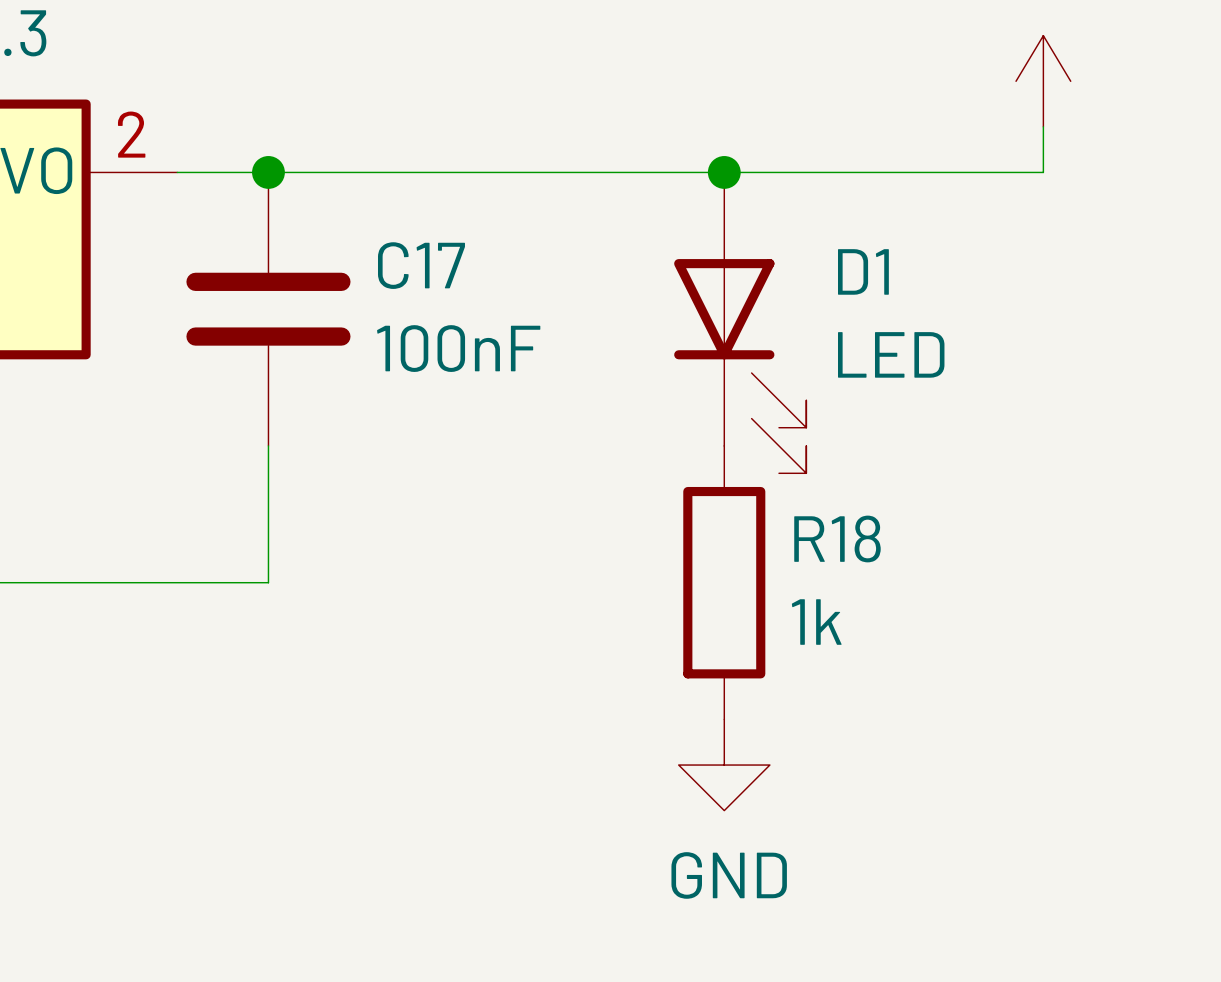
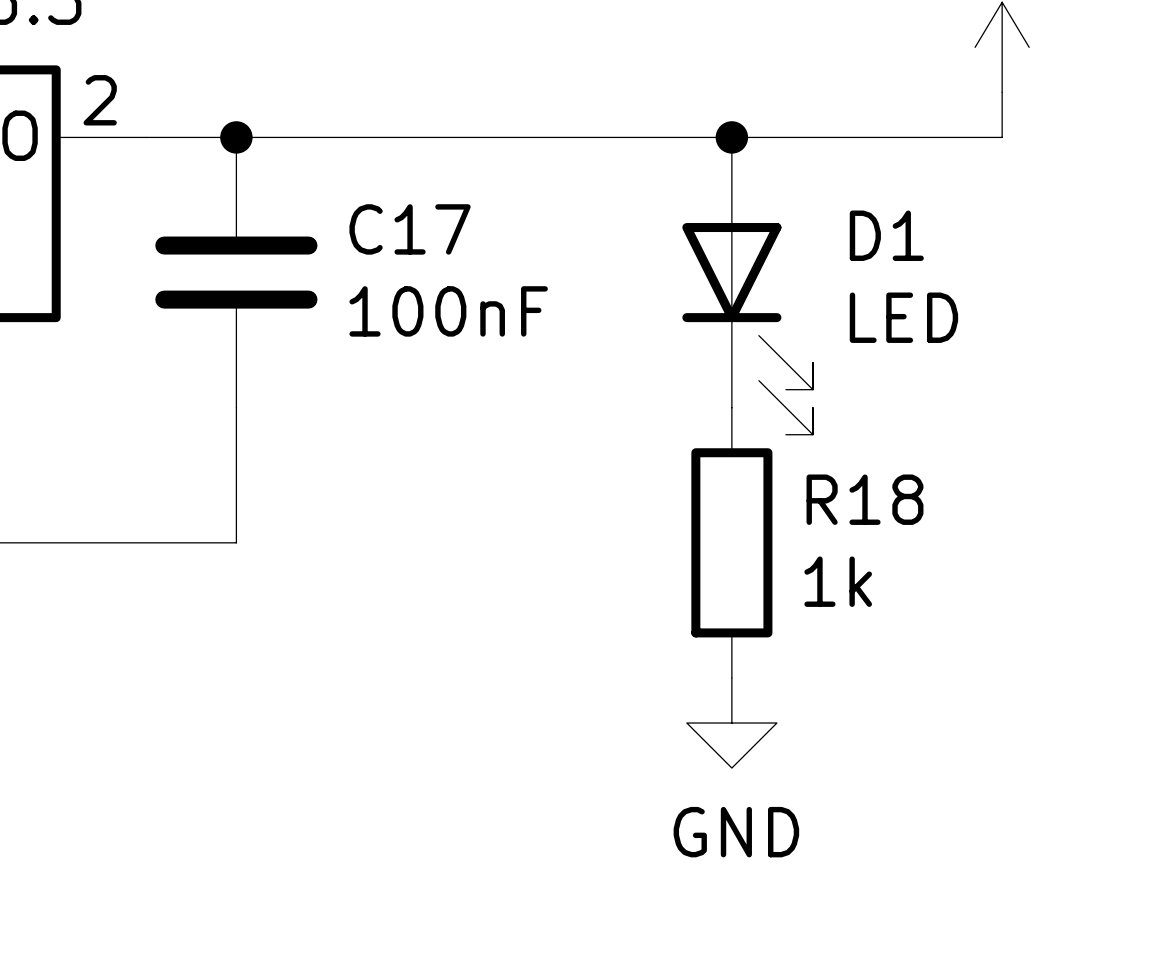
junction position: (724, 172) -> (731, 137)
D1 position: (740, 322) -> (747, 286)
R18 position: (724, 582) -> (731, 542)
power symbol position: GND (724, 765) -> GND (731, 723)

